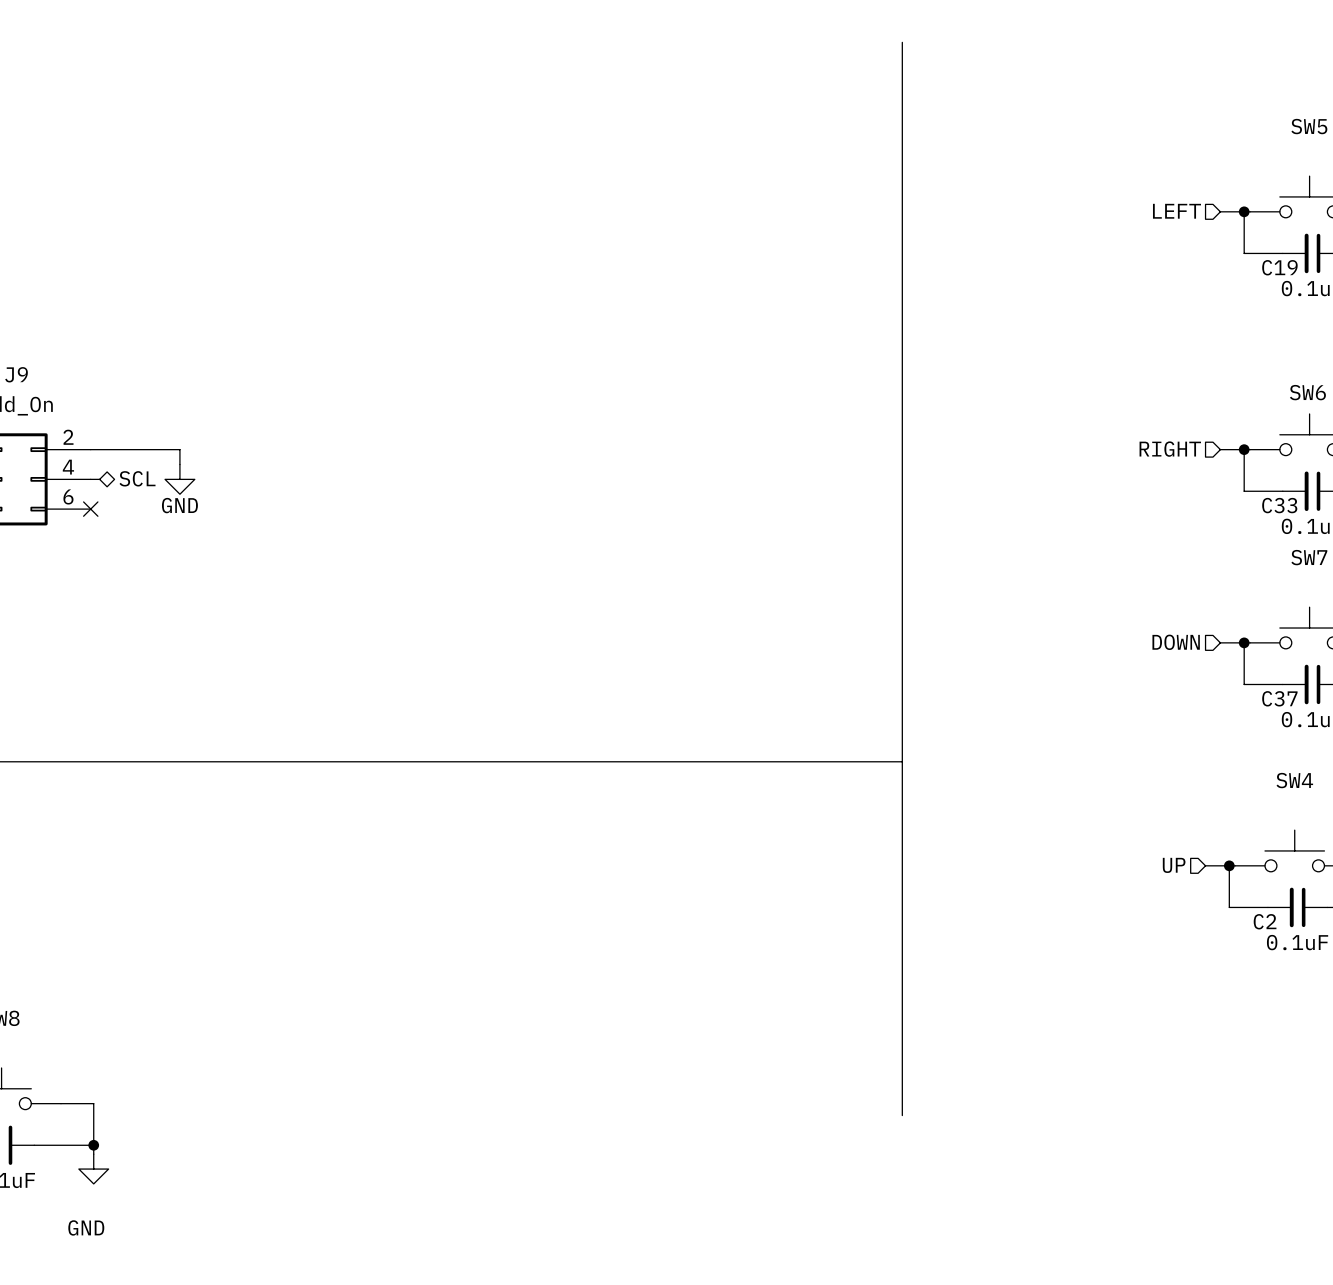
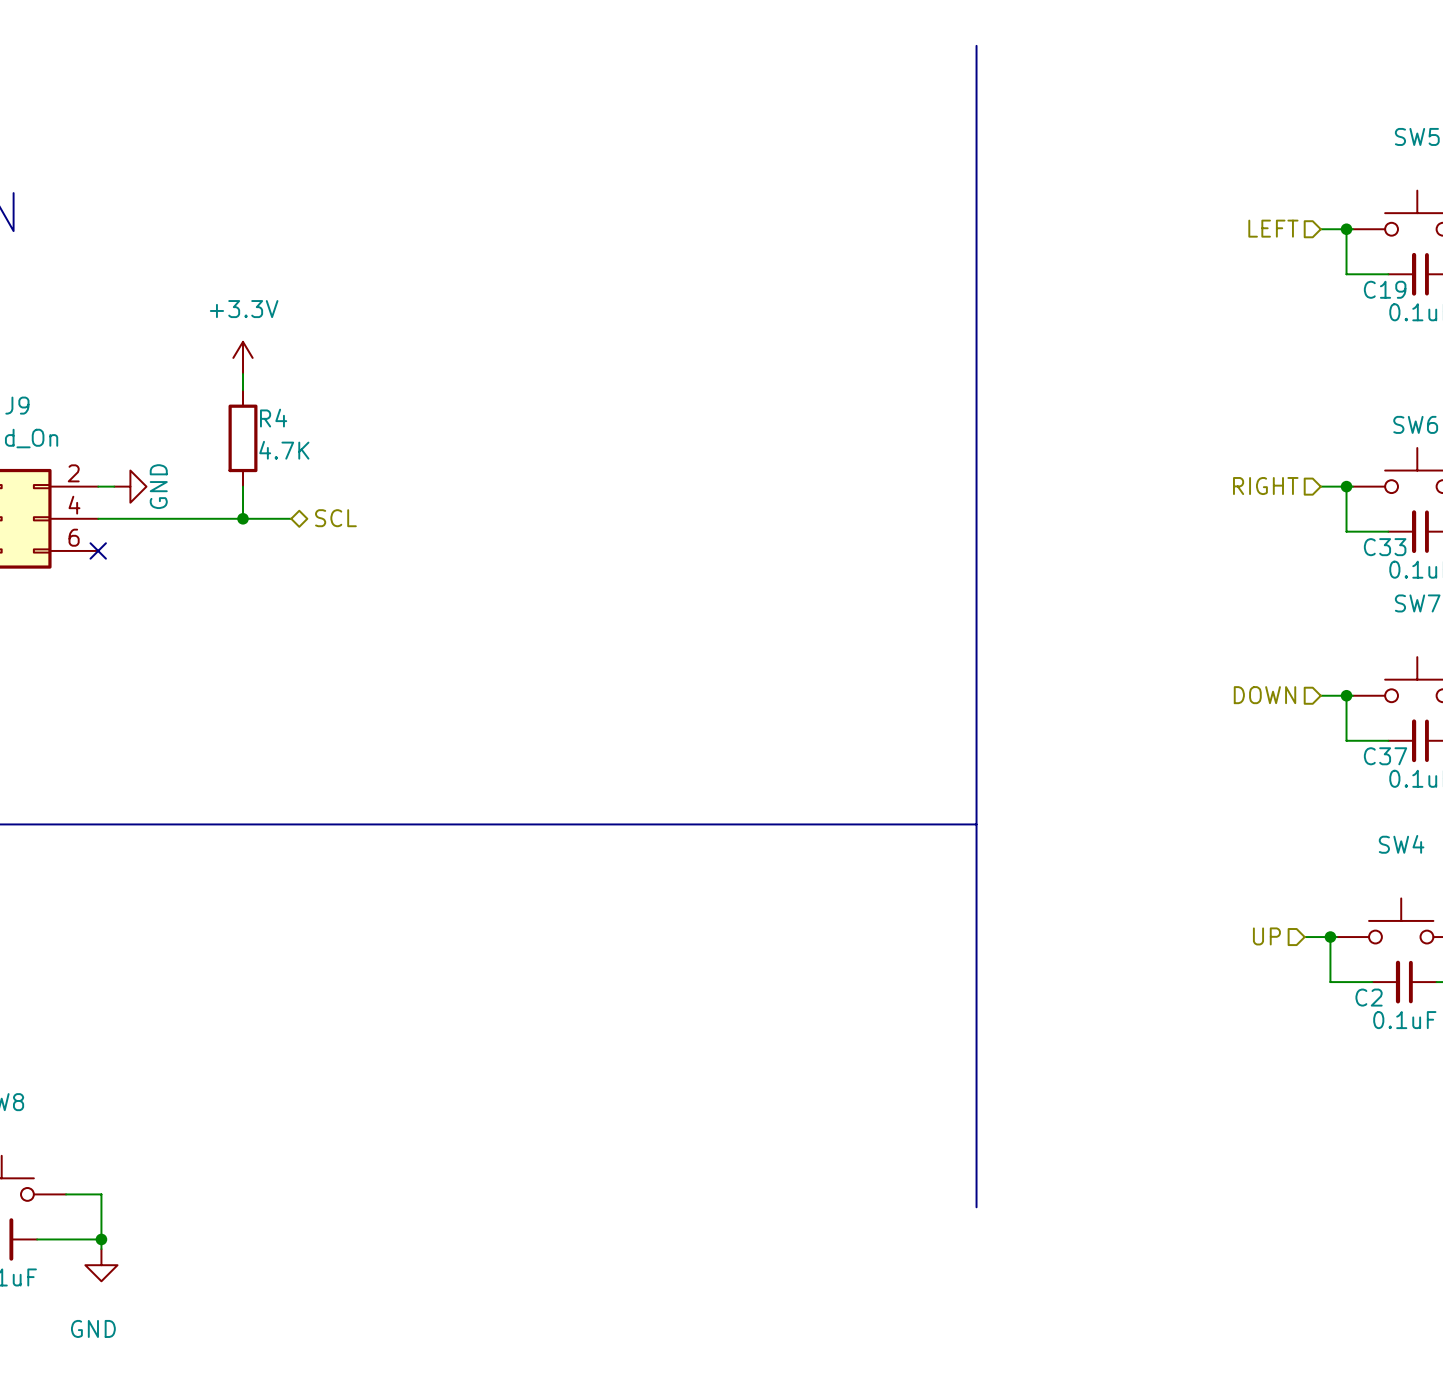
power symbol: none -> +3.3V (243, 357)
wire: none -> (243, 374) (243, 390)
R4: none -> 4.7K (243, 438)
wire: (105, 449) (179, 449) (179, 464) -> none
wire: none -> (243, 486) (243, 518)
hierarchical label position: SCL (137, 478) -> SCL (335, 518)
wire: none -> (107, 518) (291, 518)
power symbol rotation: 0° (179, 479) -> 90° counterclockwise (130, 486)
power symbol position: GND (179, 479) -> GND (130, 486)
junction: none -> (243, 518)

